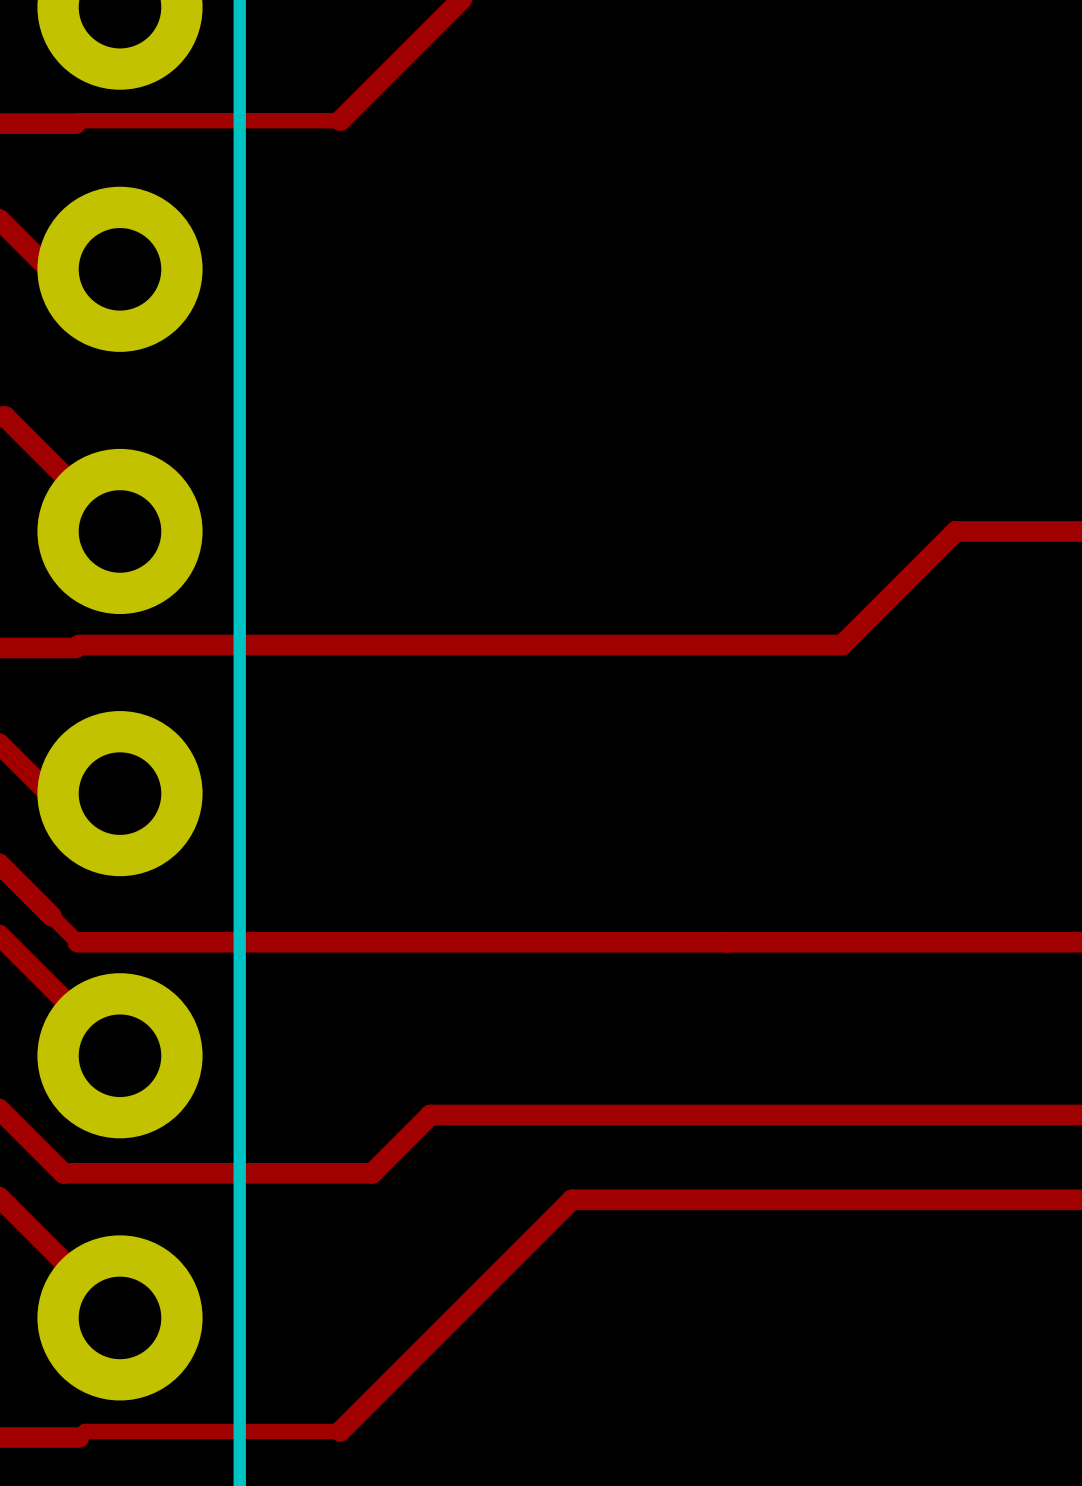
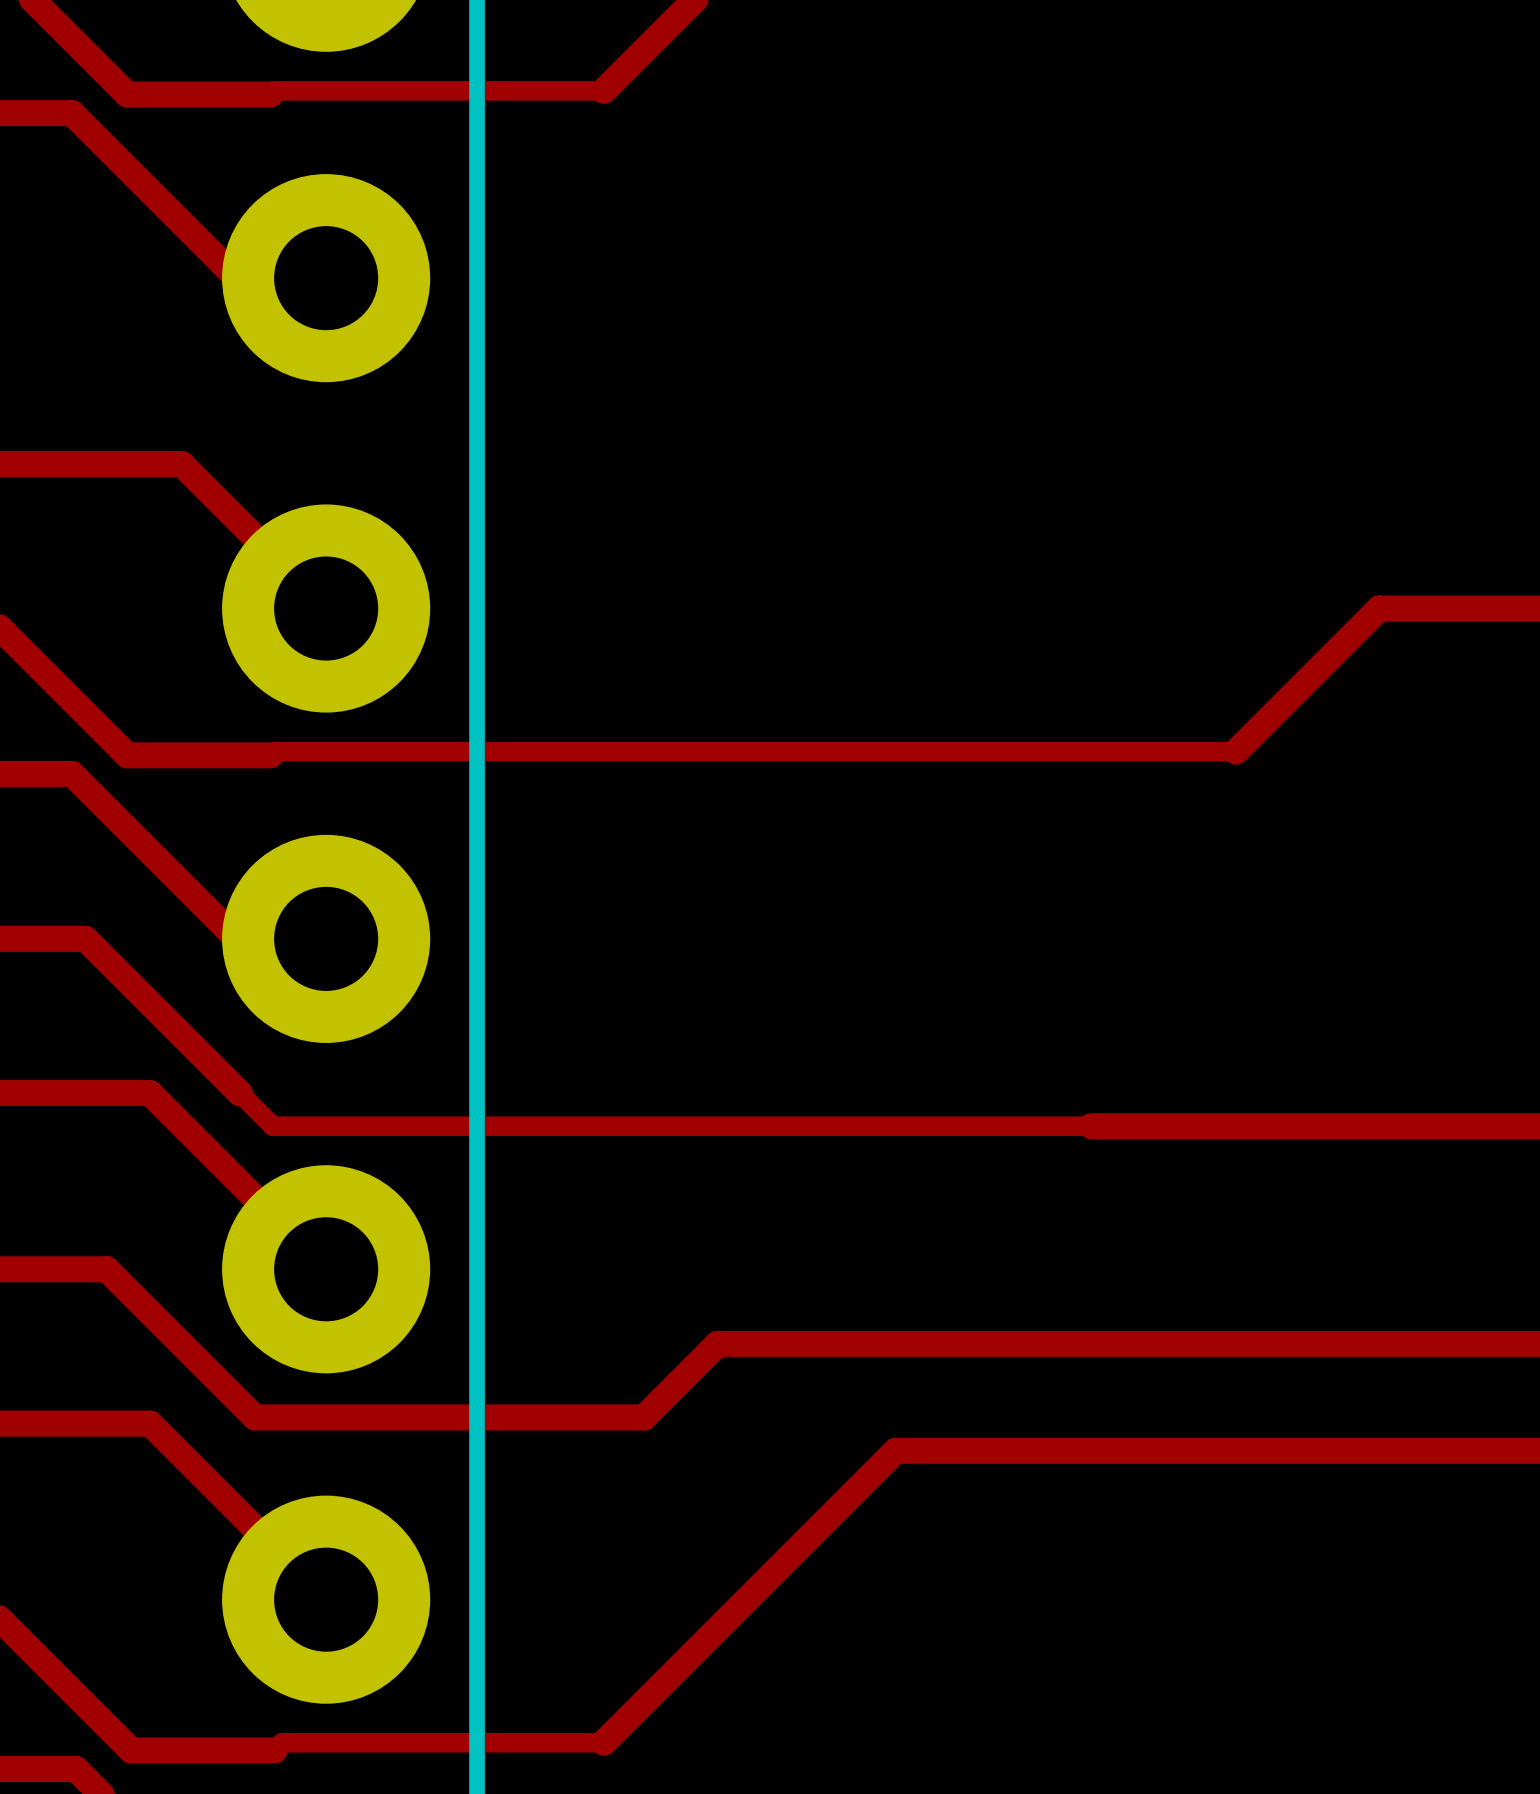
track width: thick (78, 645) (842, 645) -> thin (274, 751) (1236, 751)
track width: thick (77, 942) (727, 942) -> thin (272, 1126) (1091, 1126)

